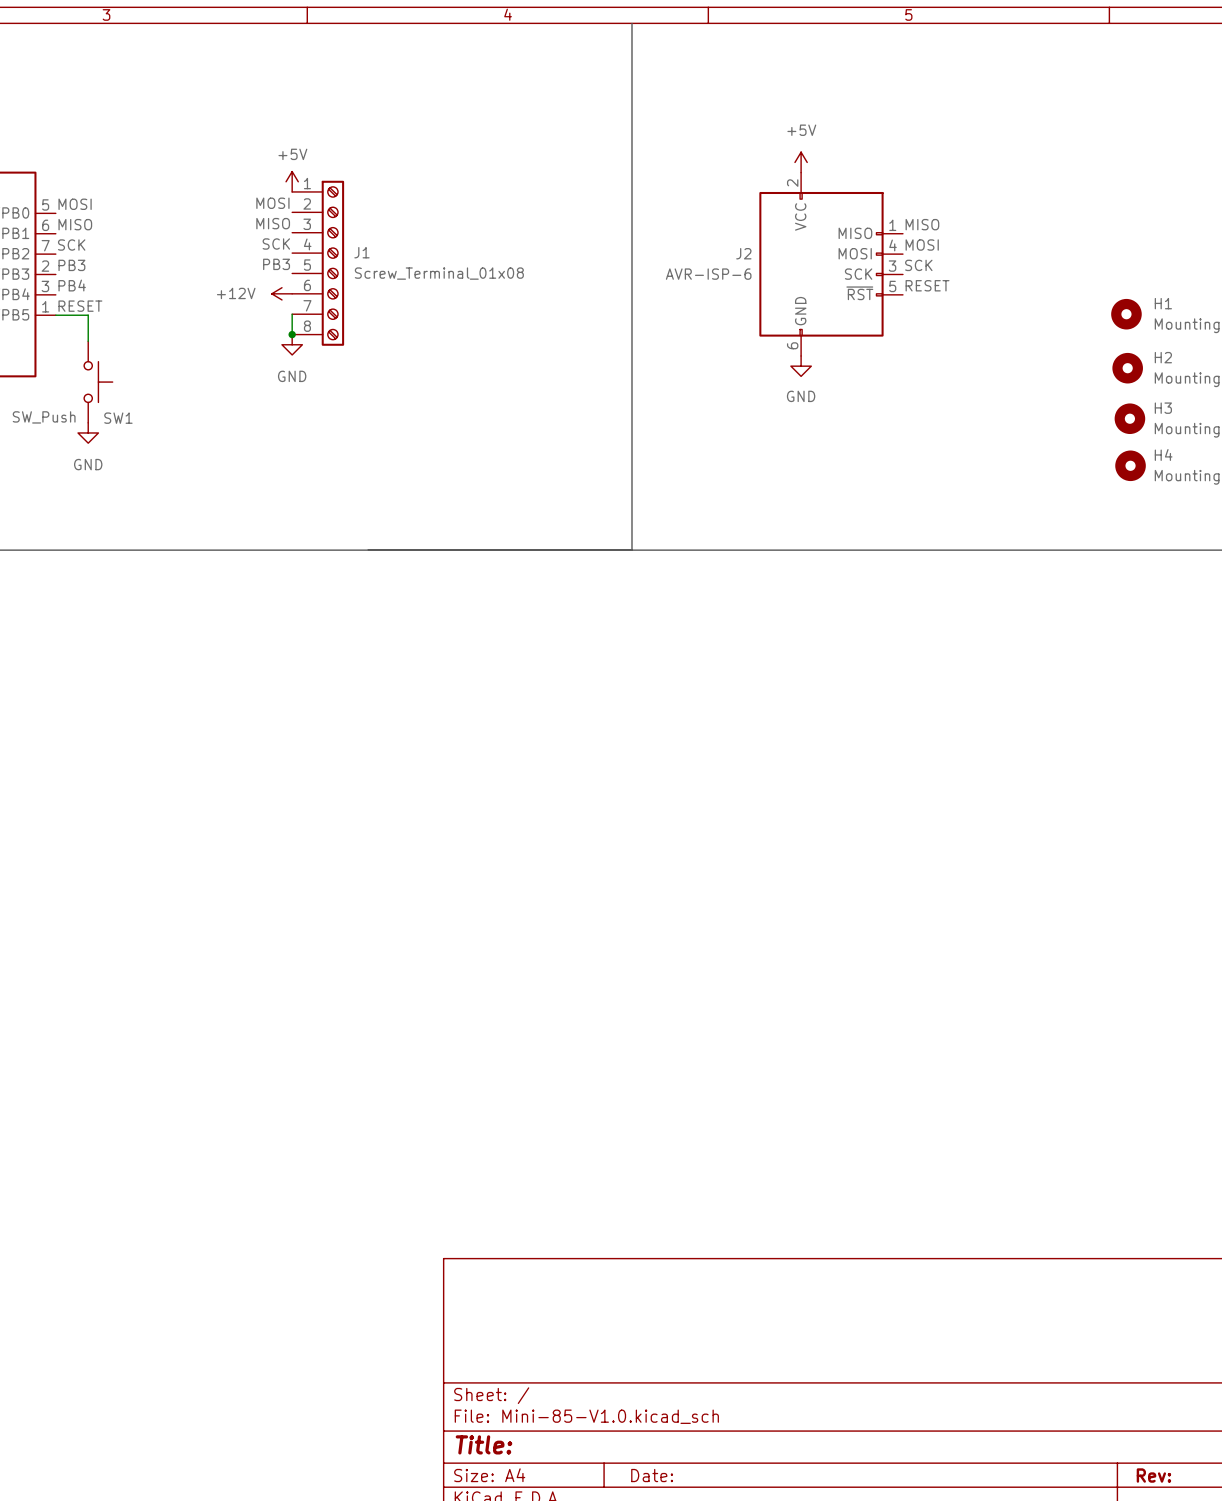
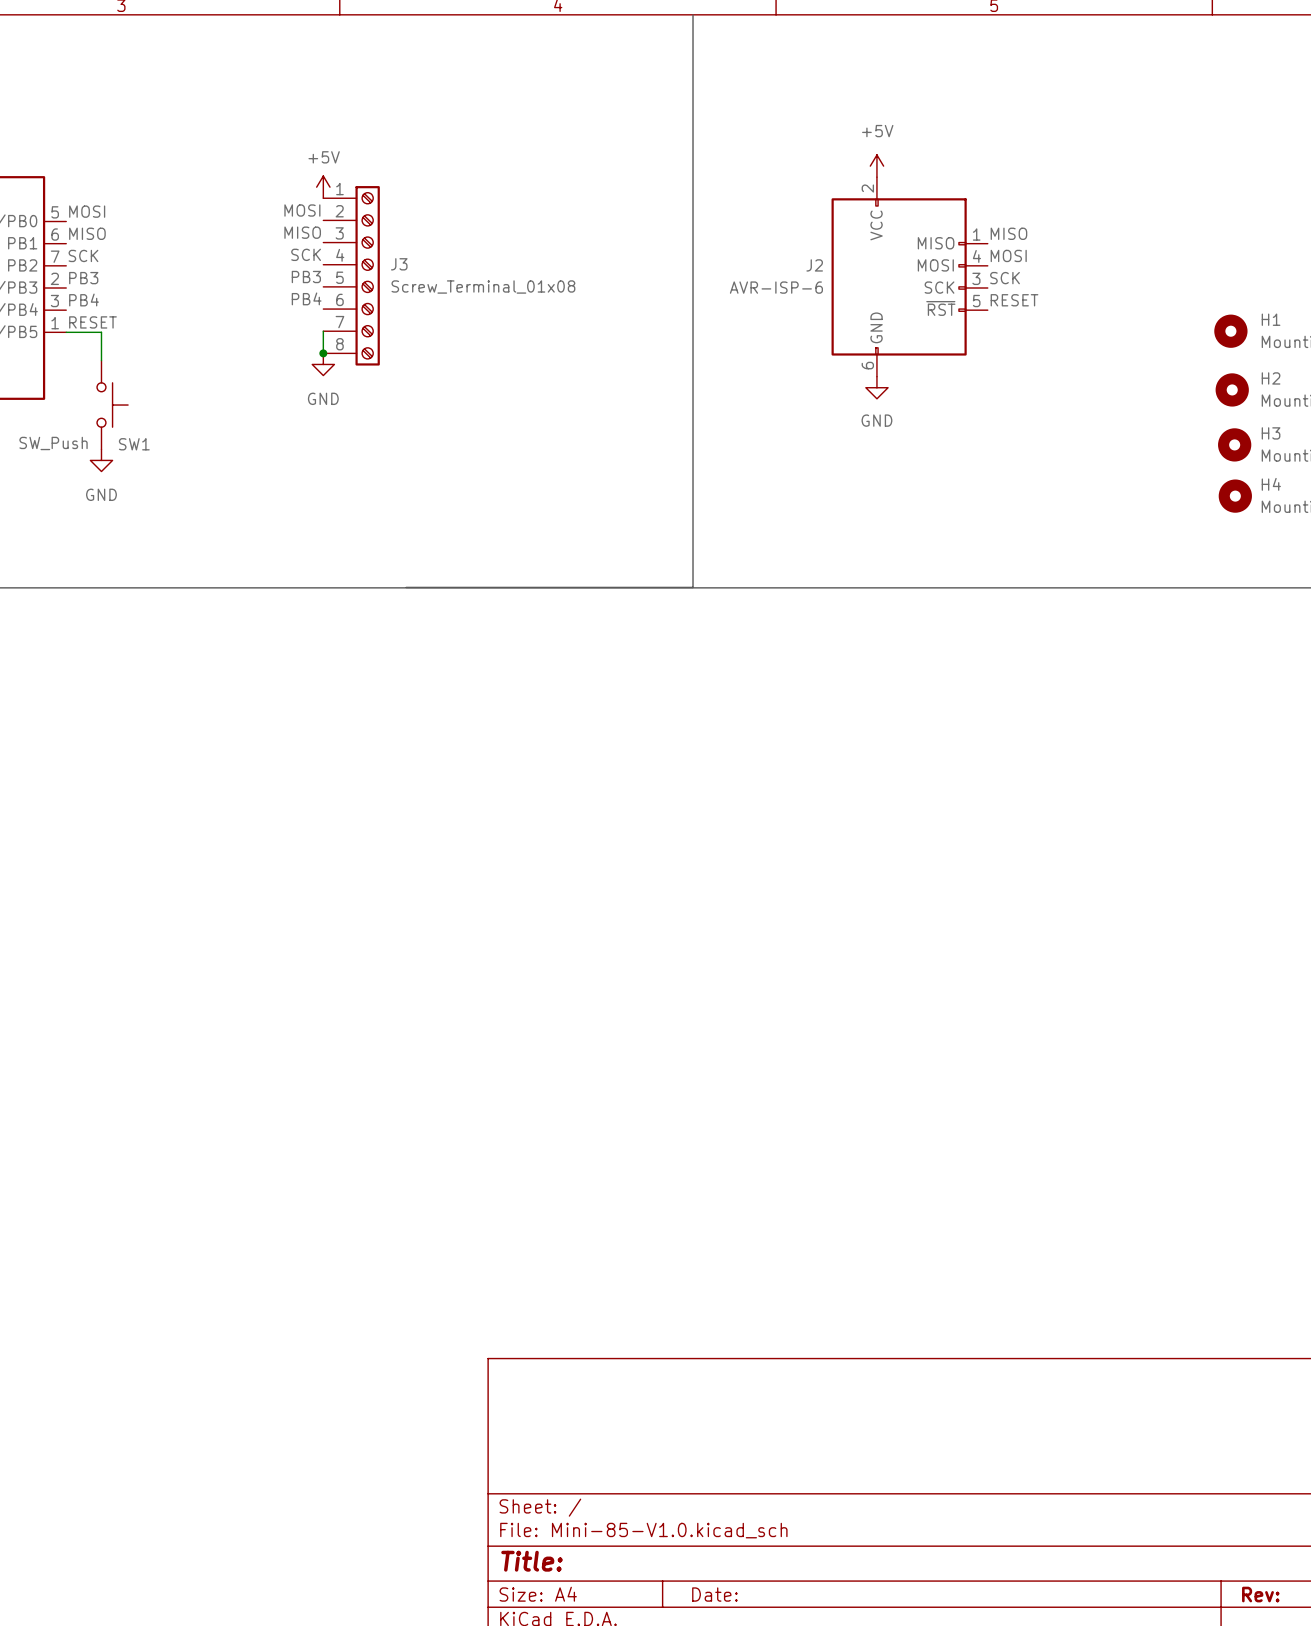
J1 name: J1 (361, 252) -> J3 (399, 264)
label: none -> PB4 (306, 298)
power symbol: +12V (281, 293) -> none

